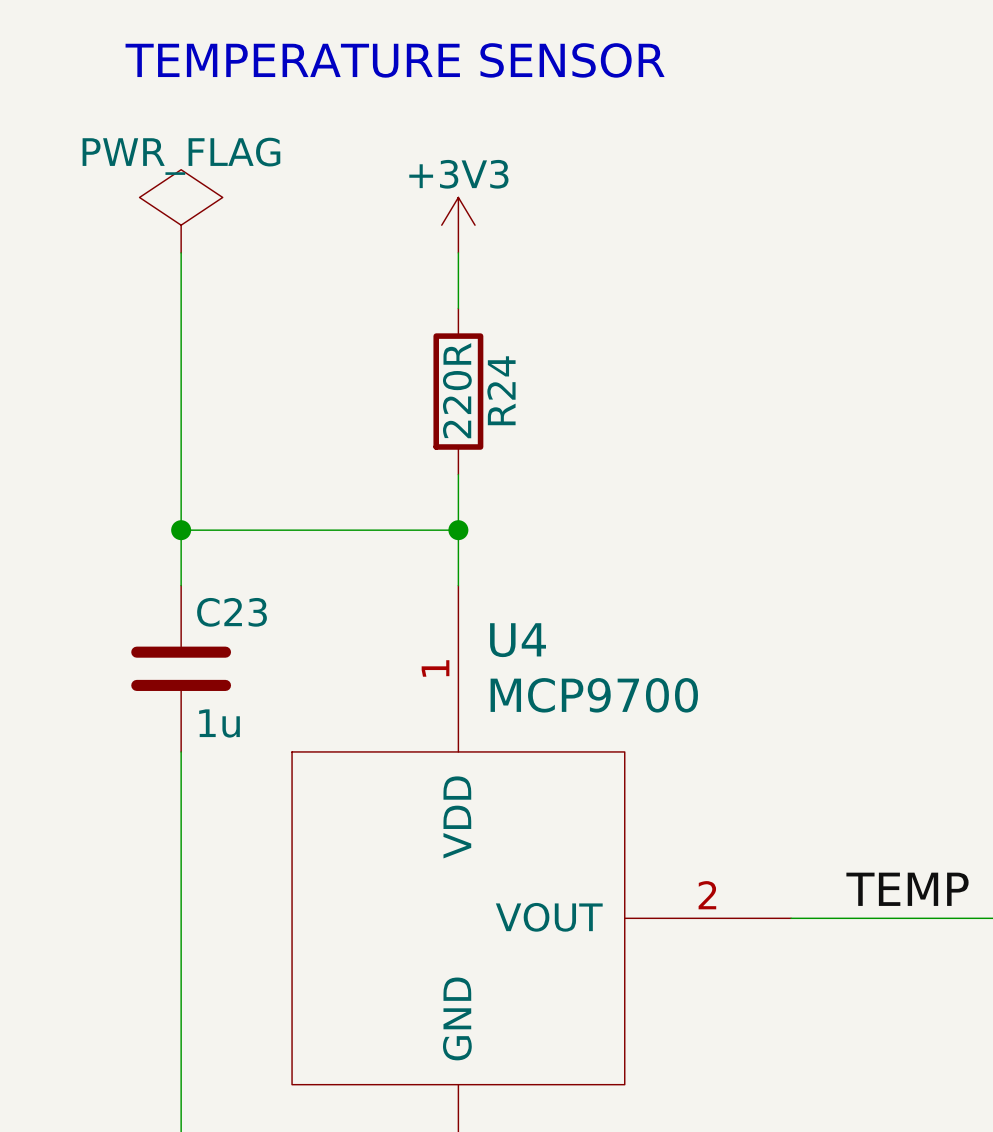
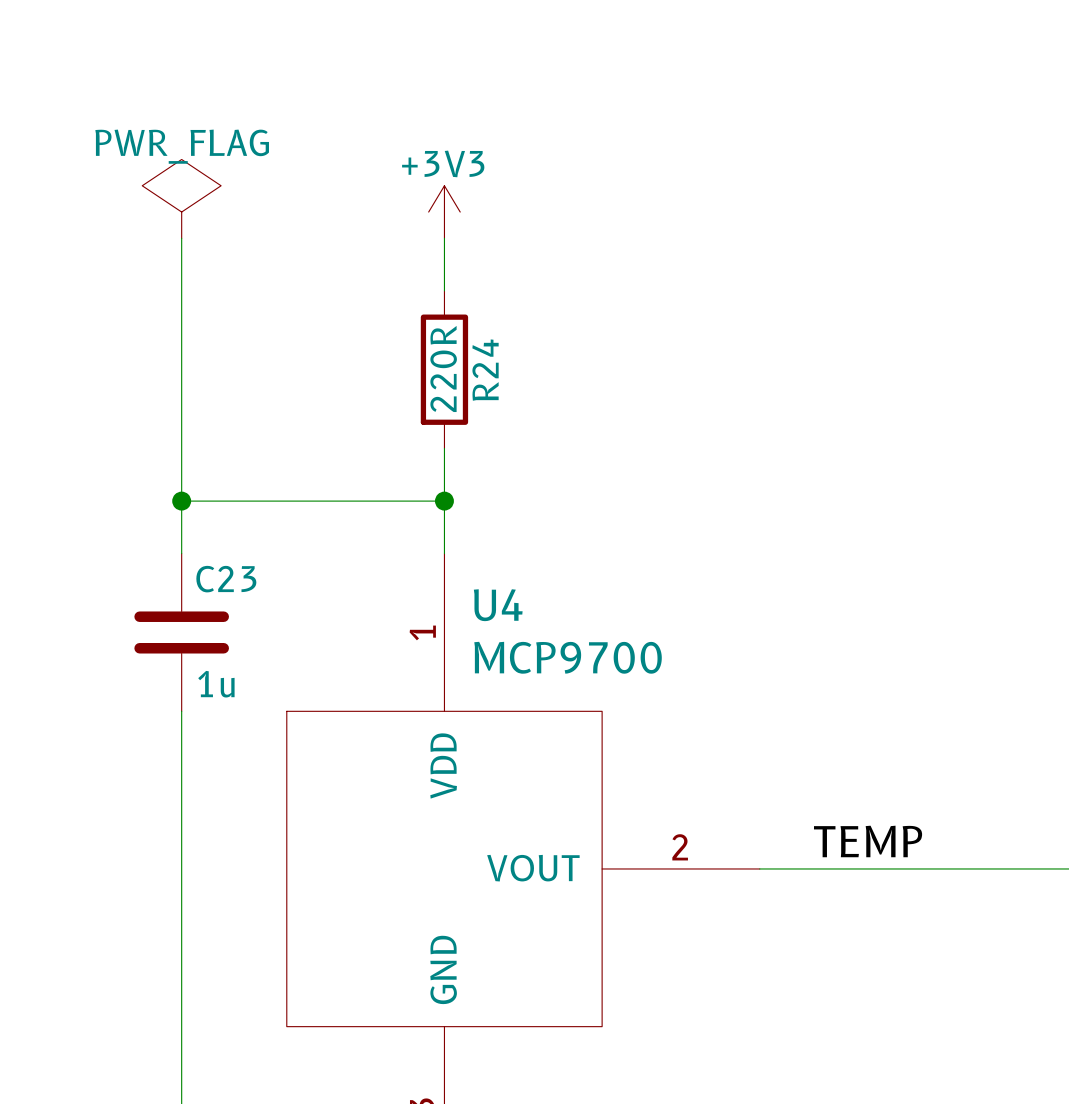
text: TEMPERATURE SENSOR (395, 60) -> none

